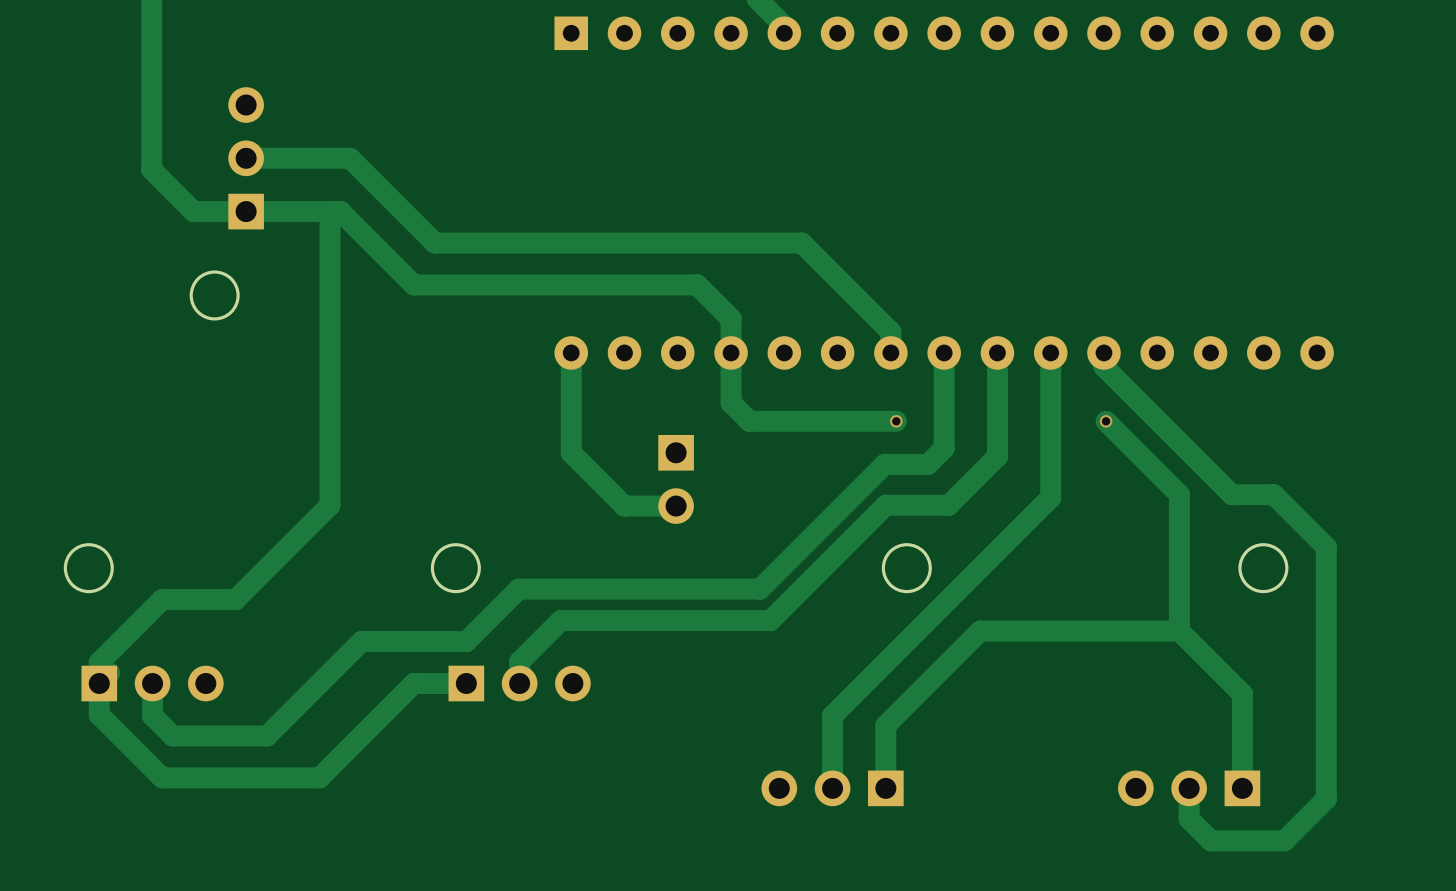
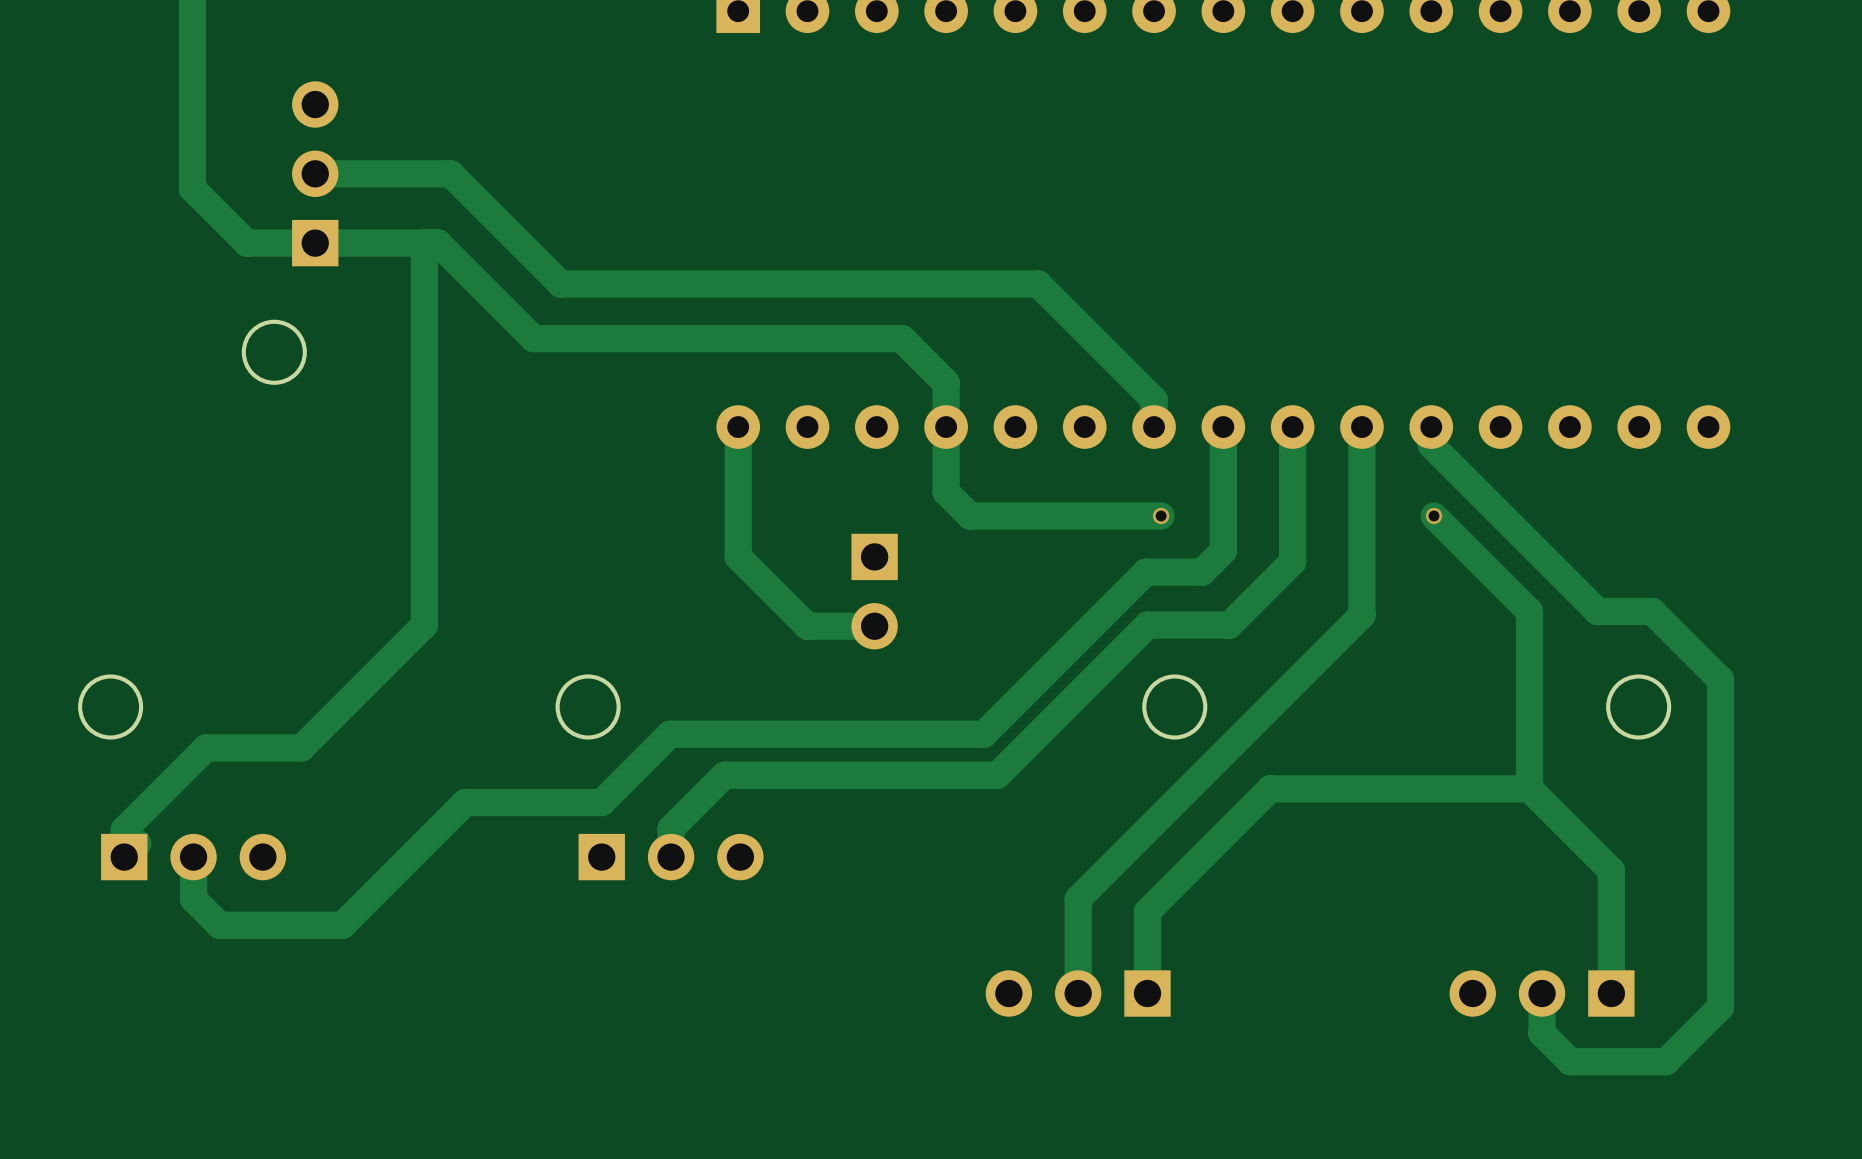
track: (466, 683) (413, 683) (319, 777) (162, 777) (99, 714) (99, 683) -> none

